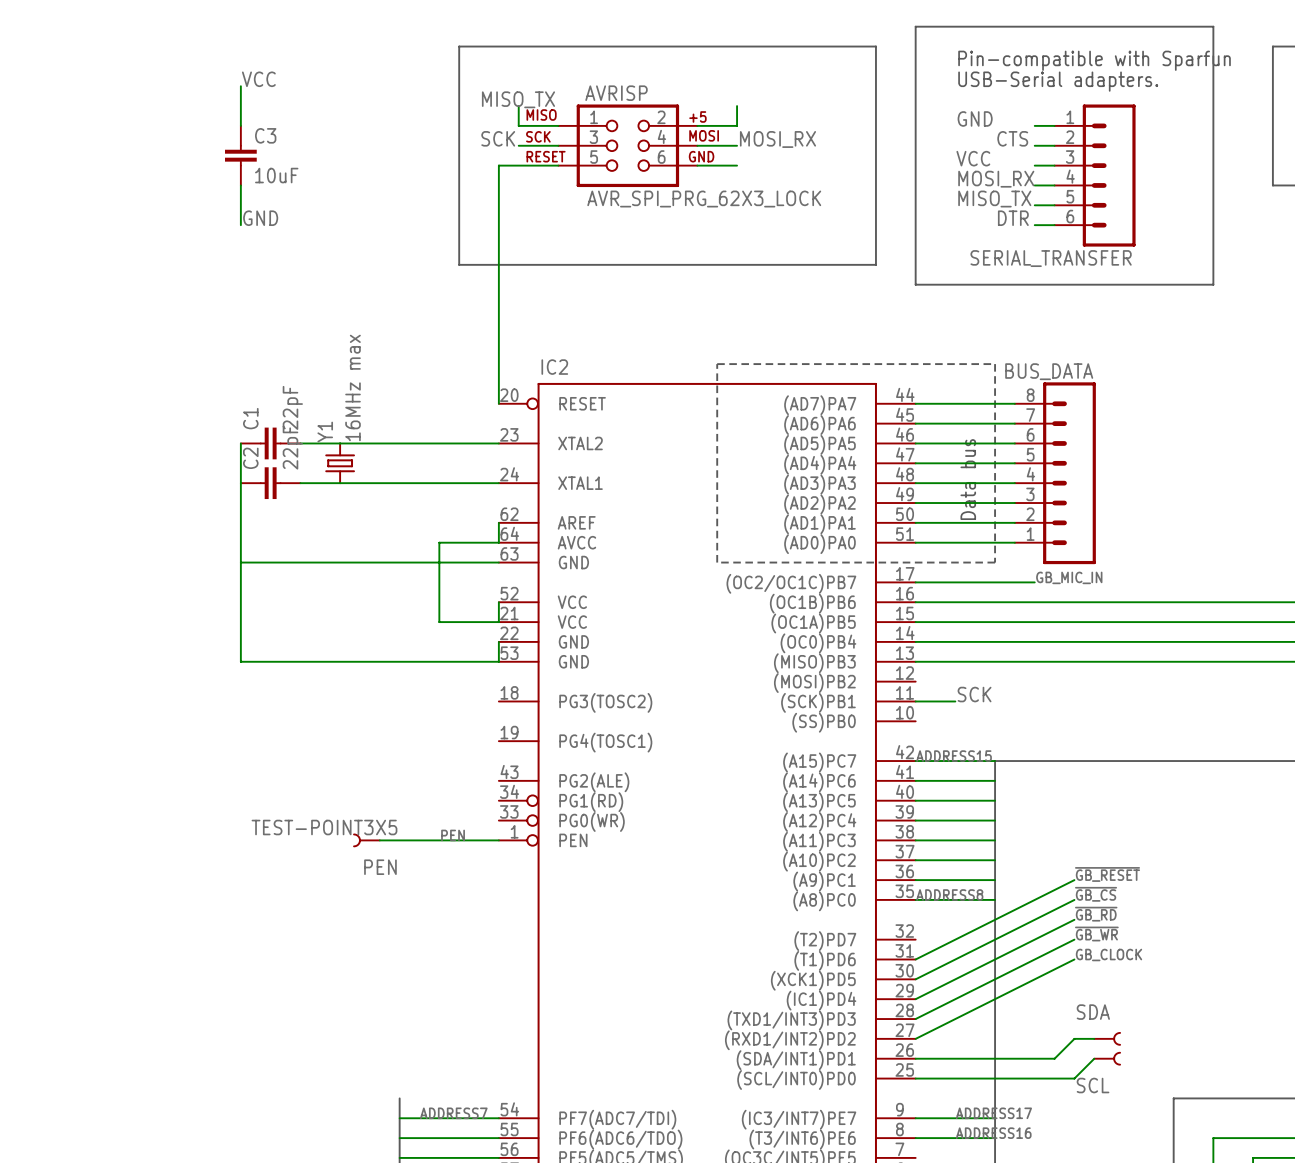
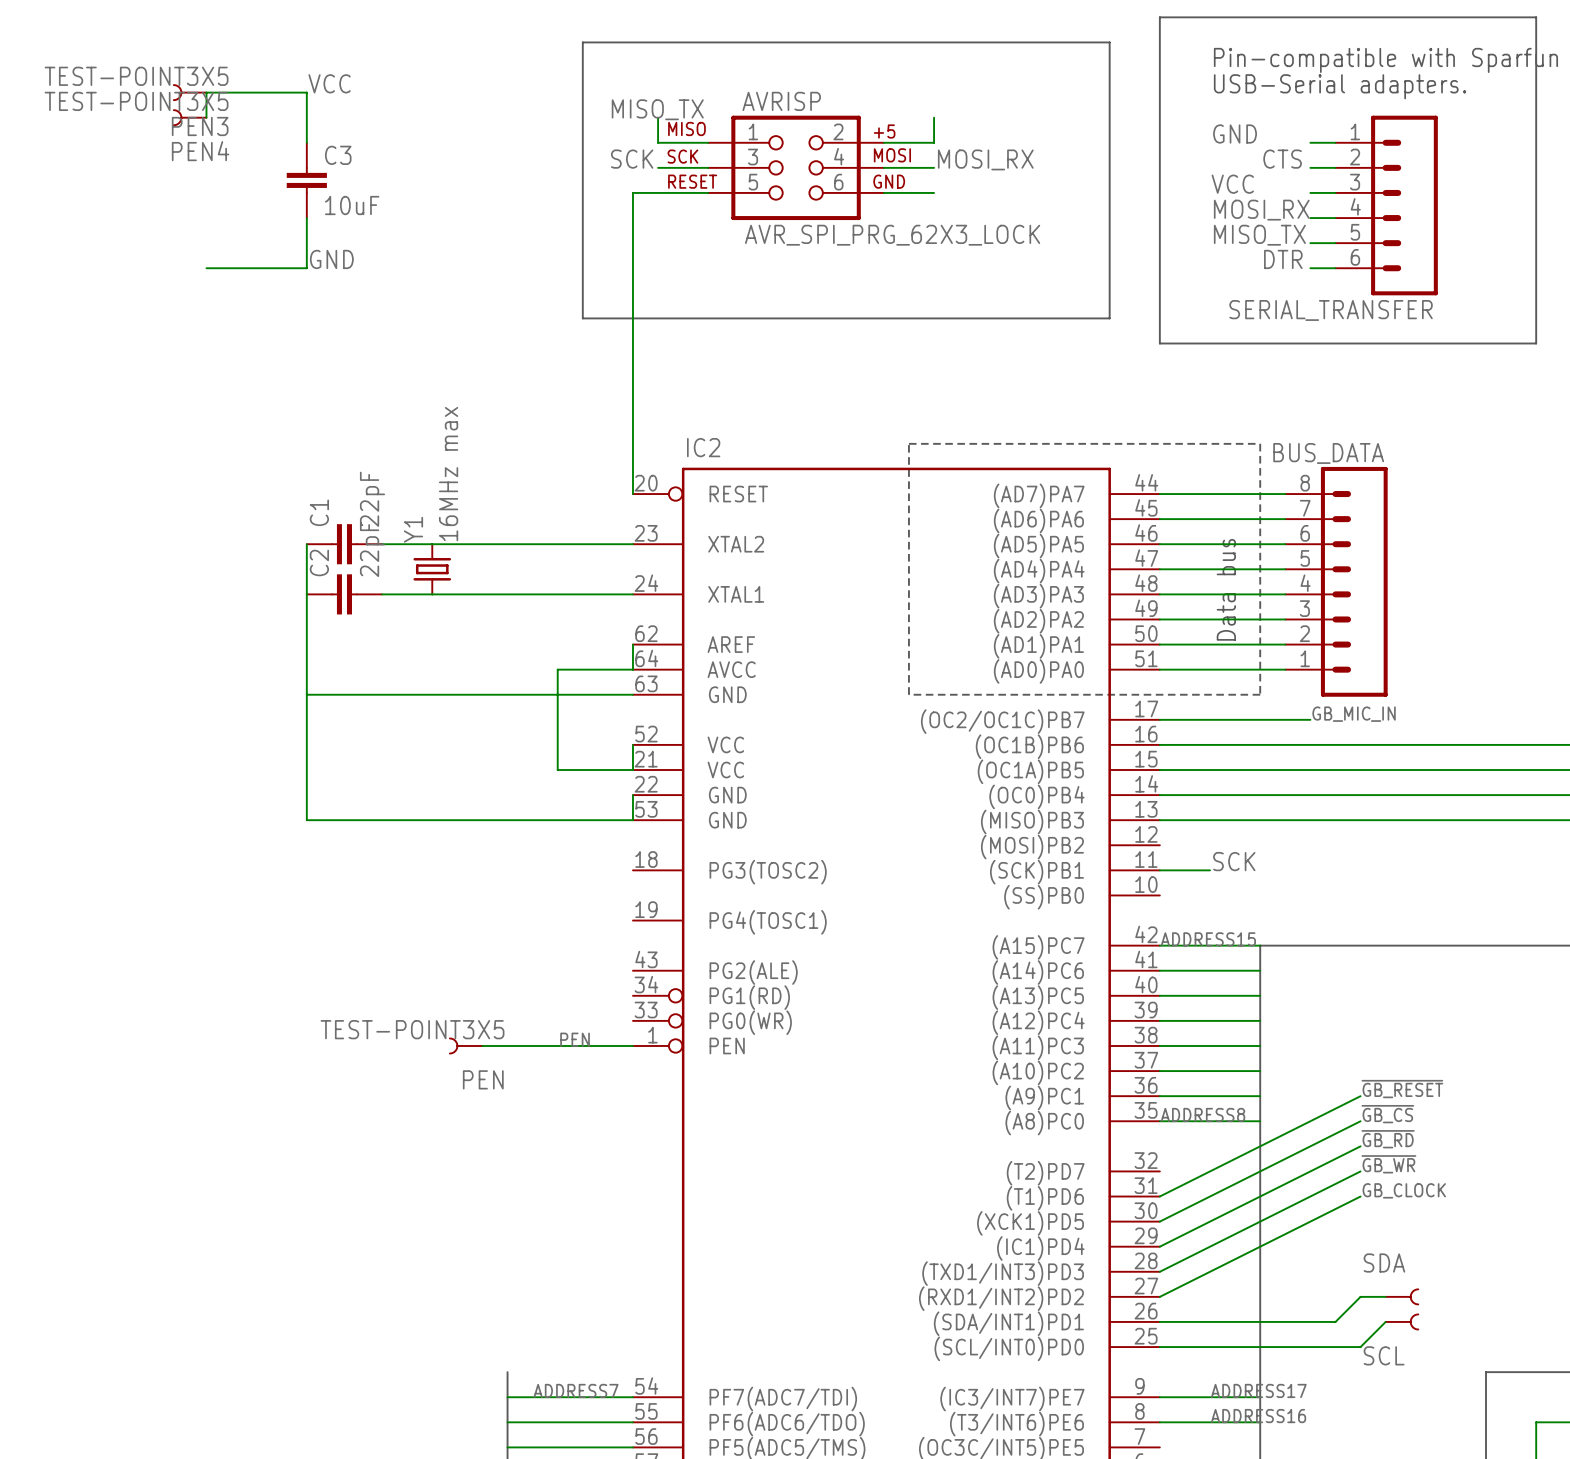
PEN3: none -> TEST-POINT3X5 (190, 92)
wire: none -> (306, 92) (206, 92) (206, 117)
PEN4: none -> TEST-POINT3X5 (190, 117)
wire: none -> (206, 268) (306, 268)

